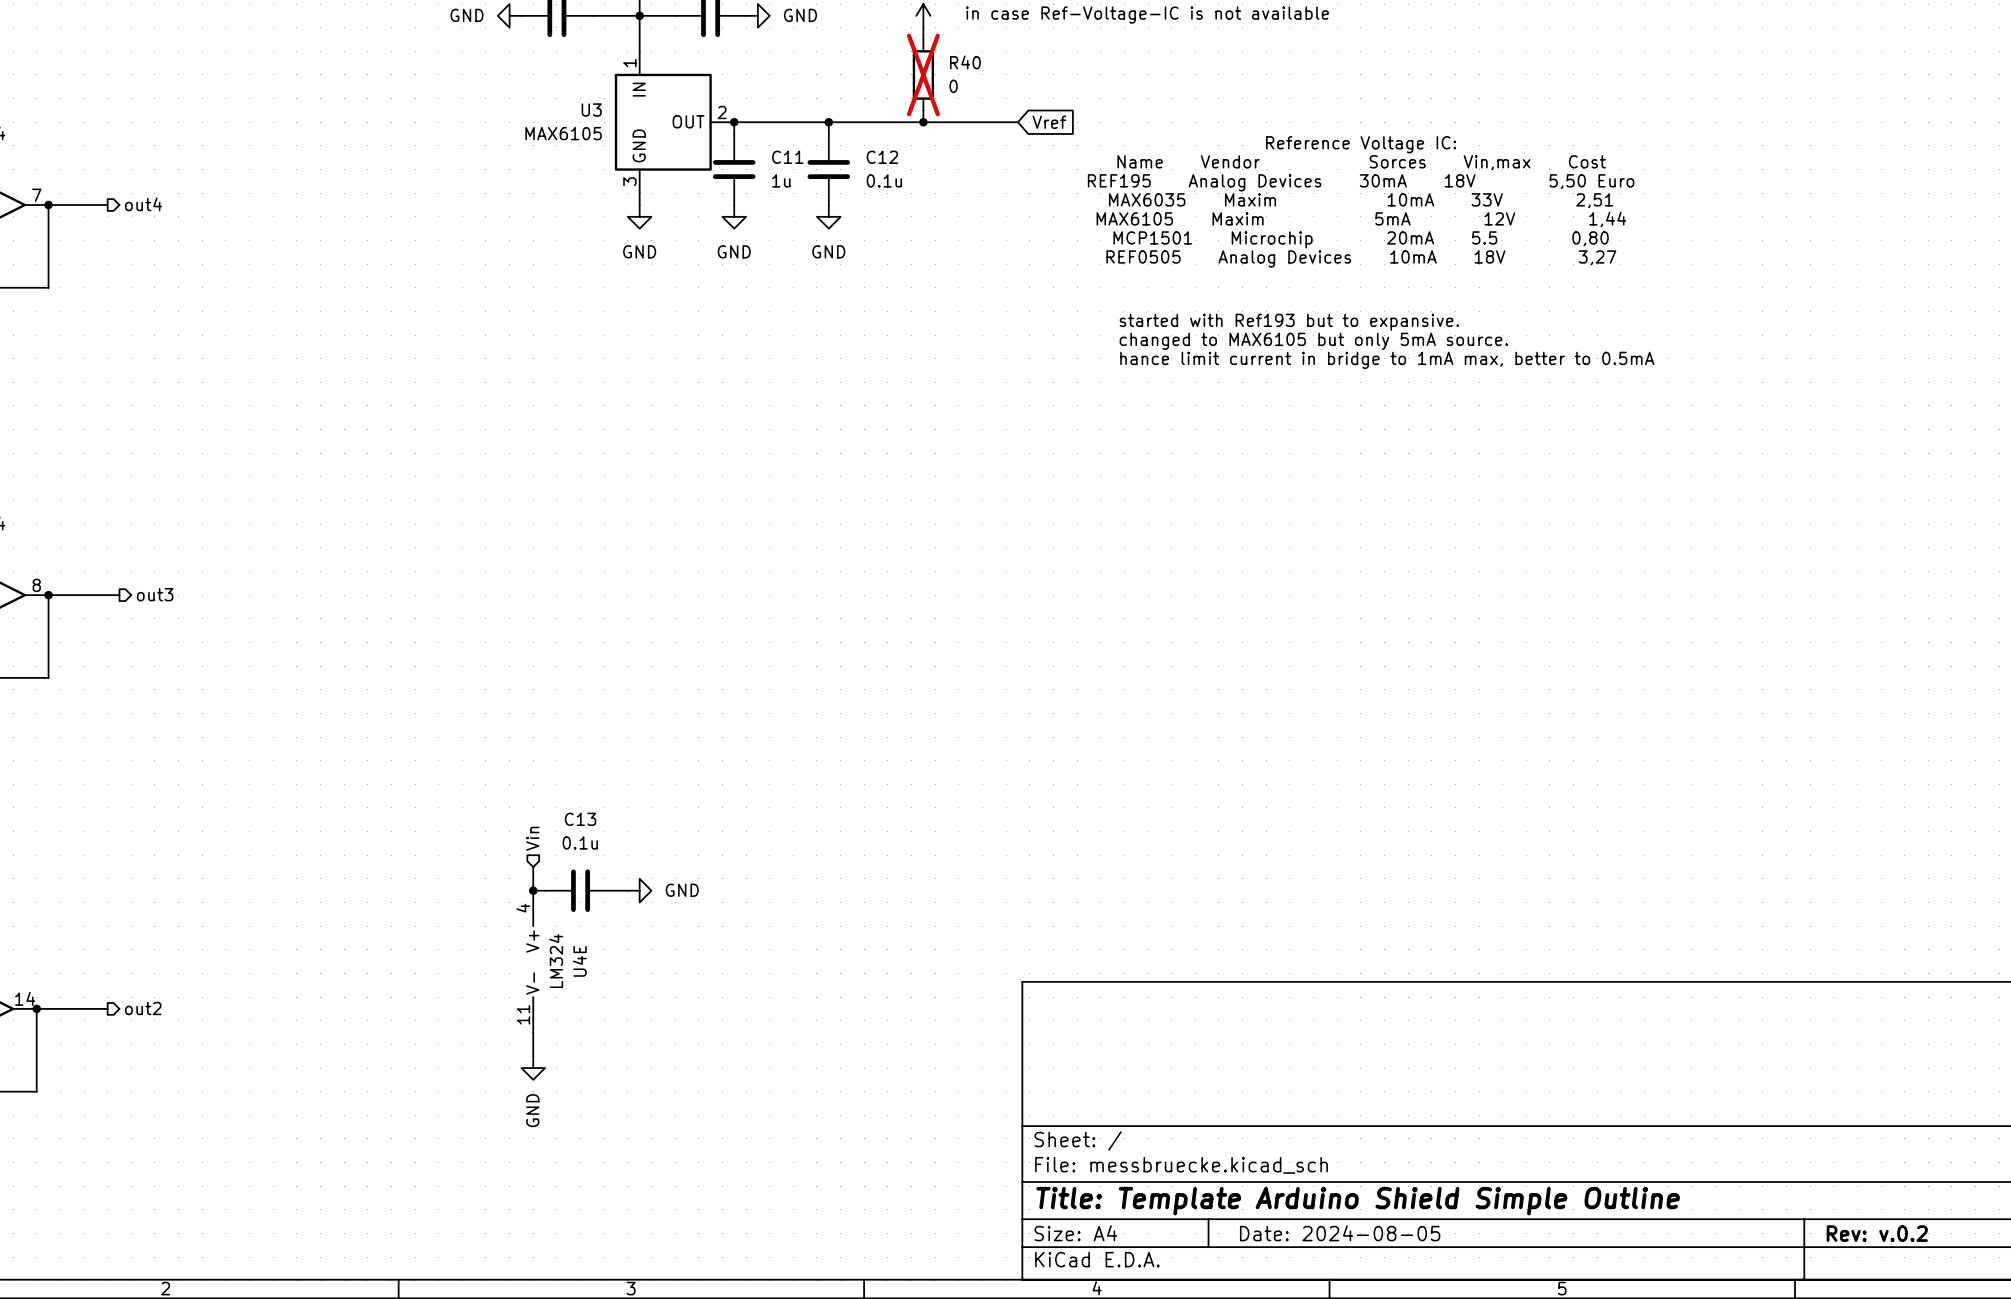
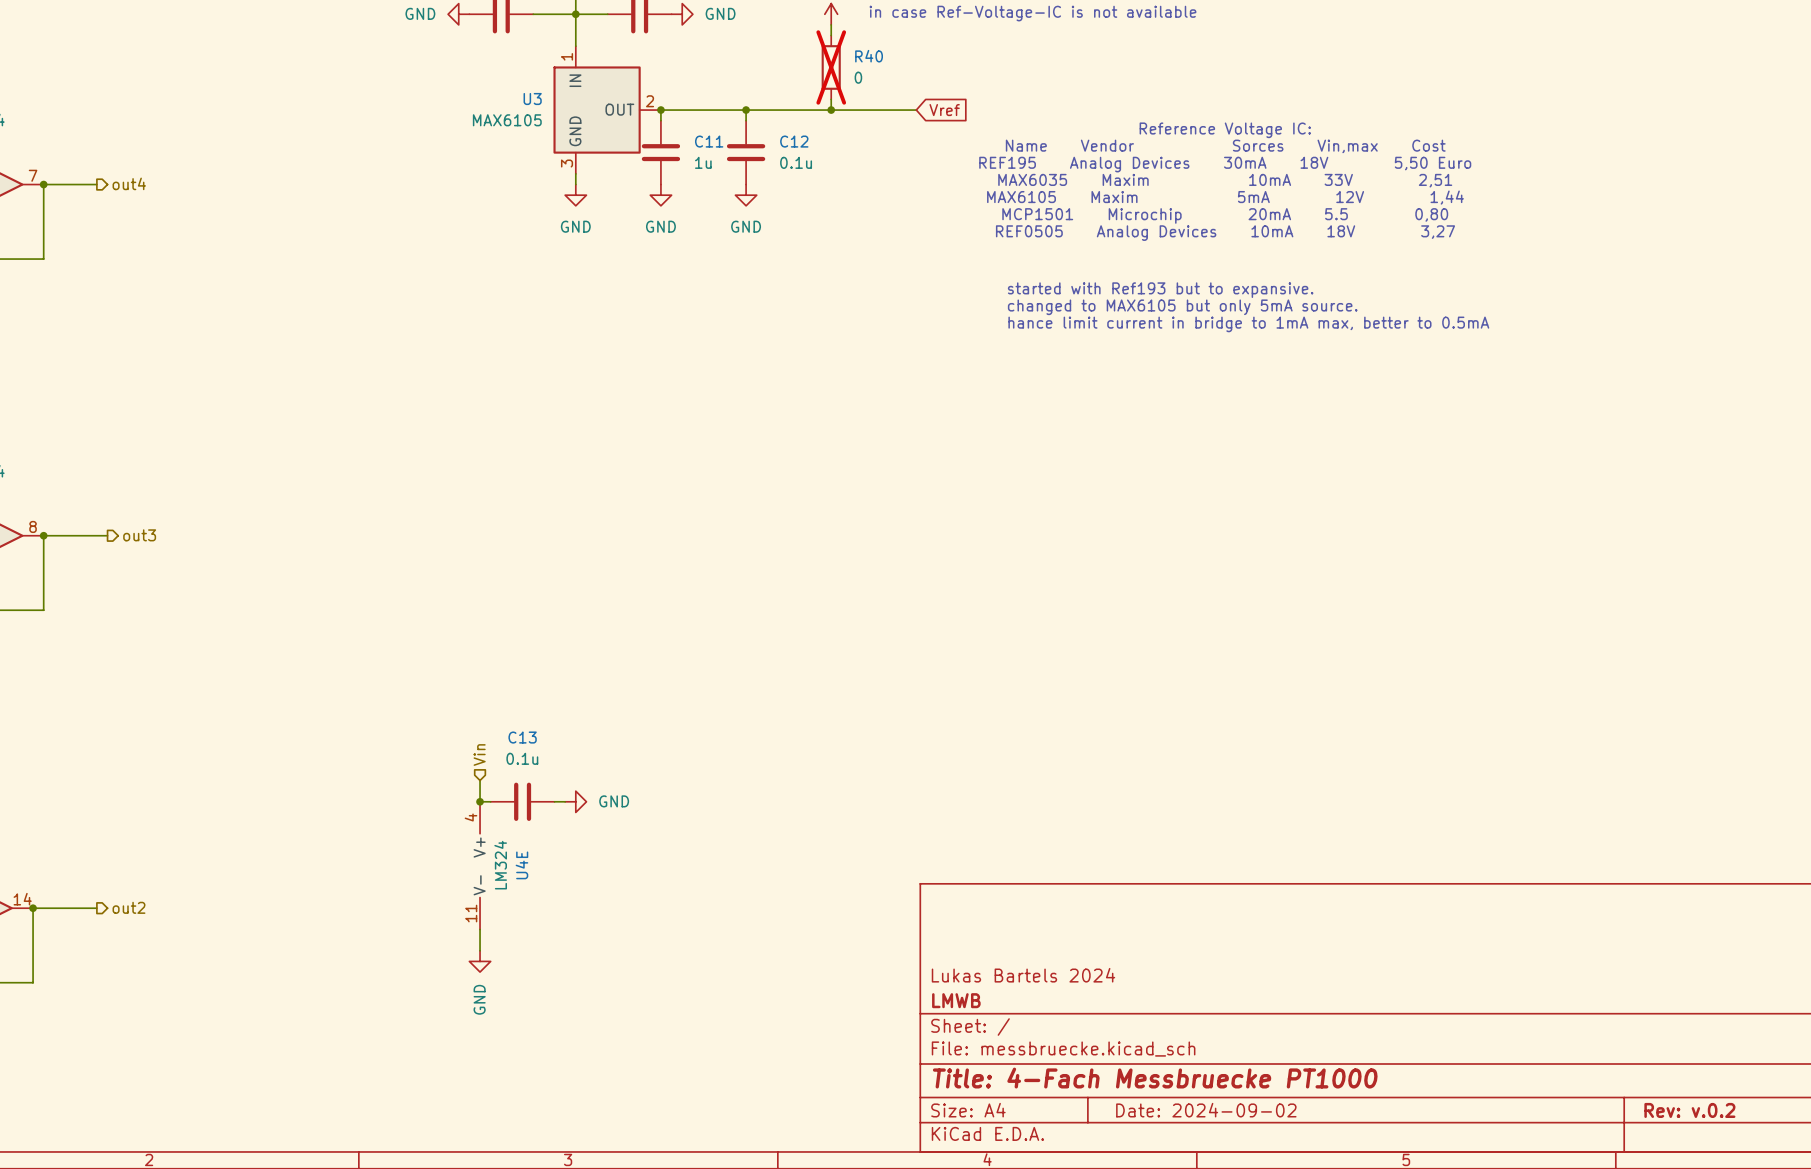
title block: none -> Lukas Bartels 2024 (1023, 975)
title block: none -> LMWB (956, 1000)
title block: Title: Template Arduino Shield Simple Outline (1358, 1201) -> Title: 4-Fach Messbruecke PT1000 (1155, 1078)
title block: Date: 2024-08-05 (1340, 1233) -> Date: 2024-09-02 (1206, 1110)

